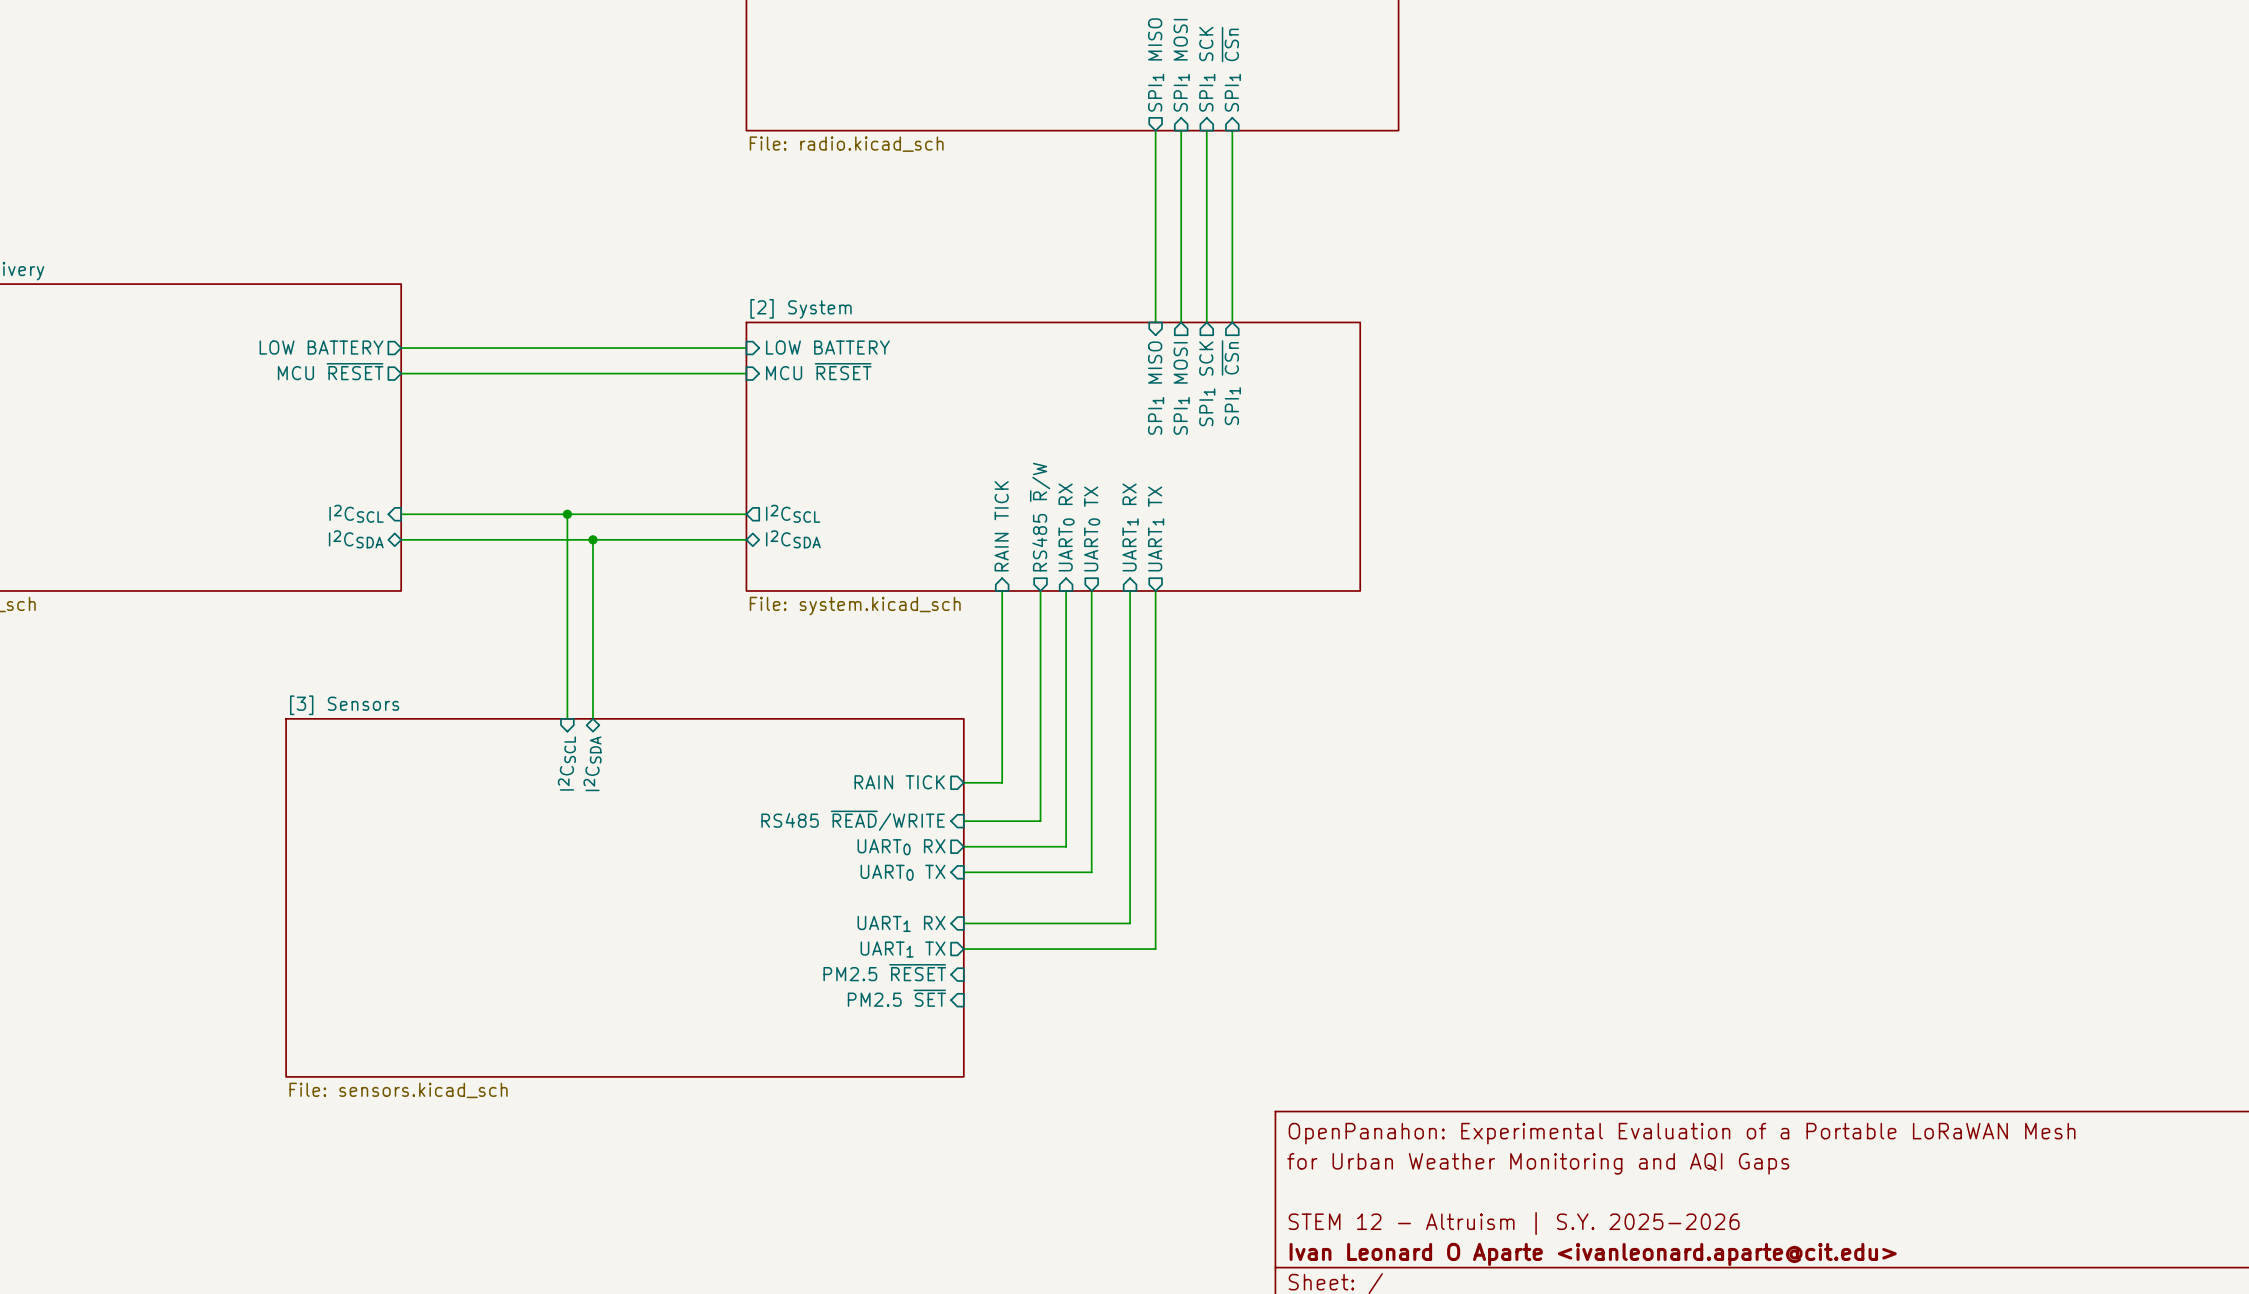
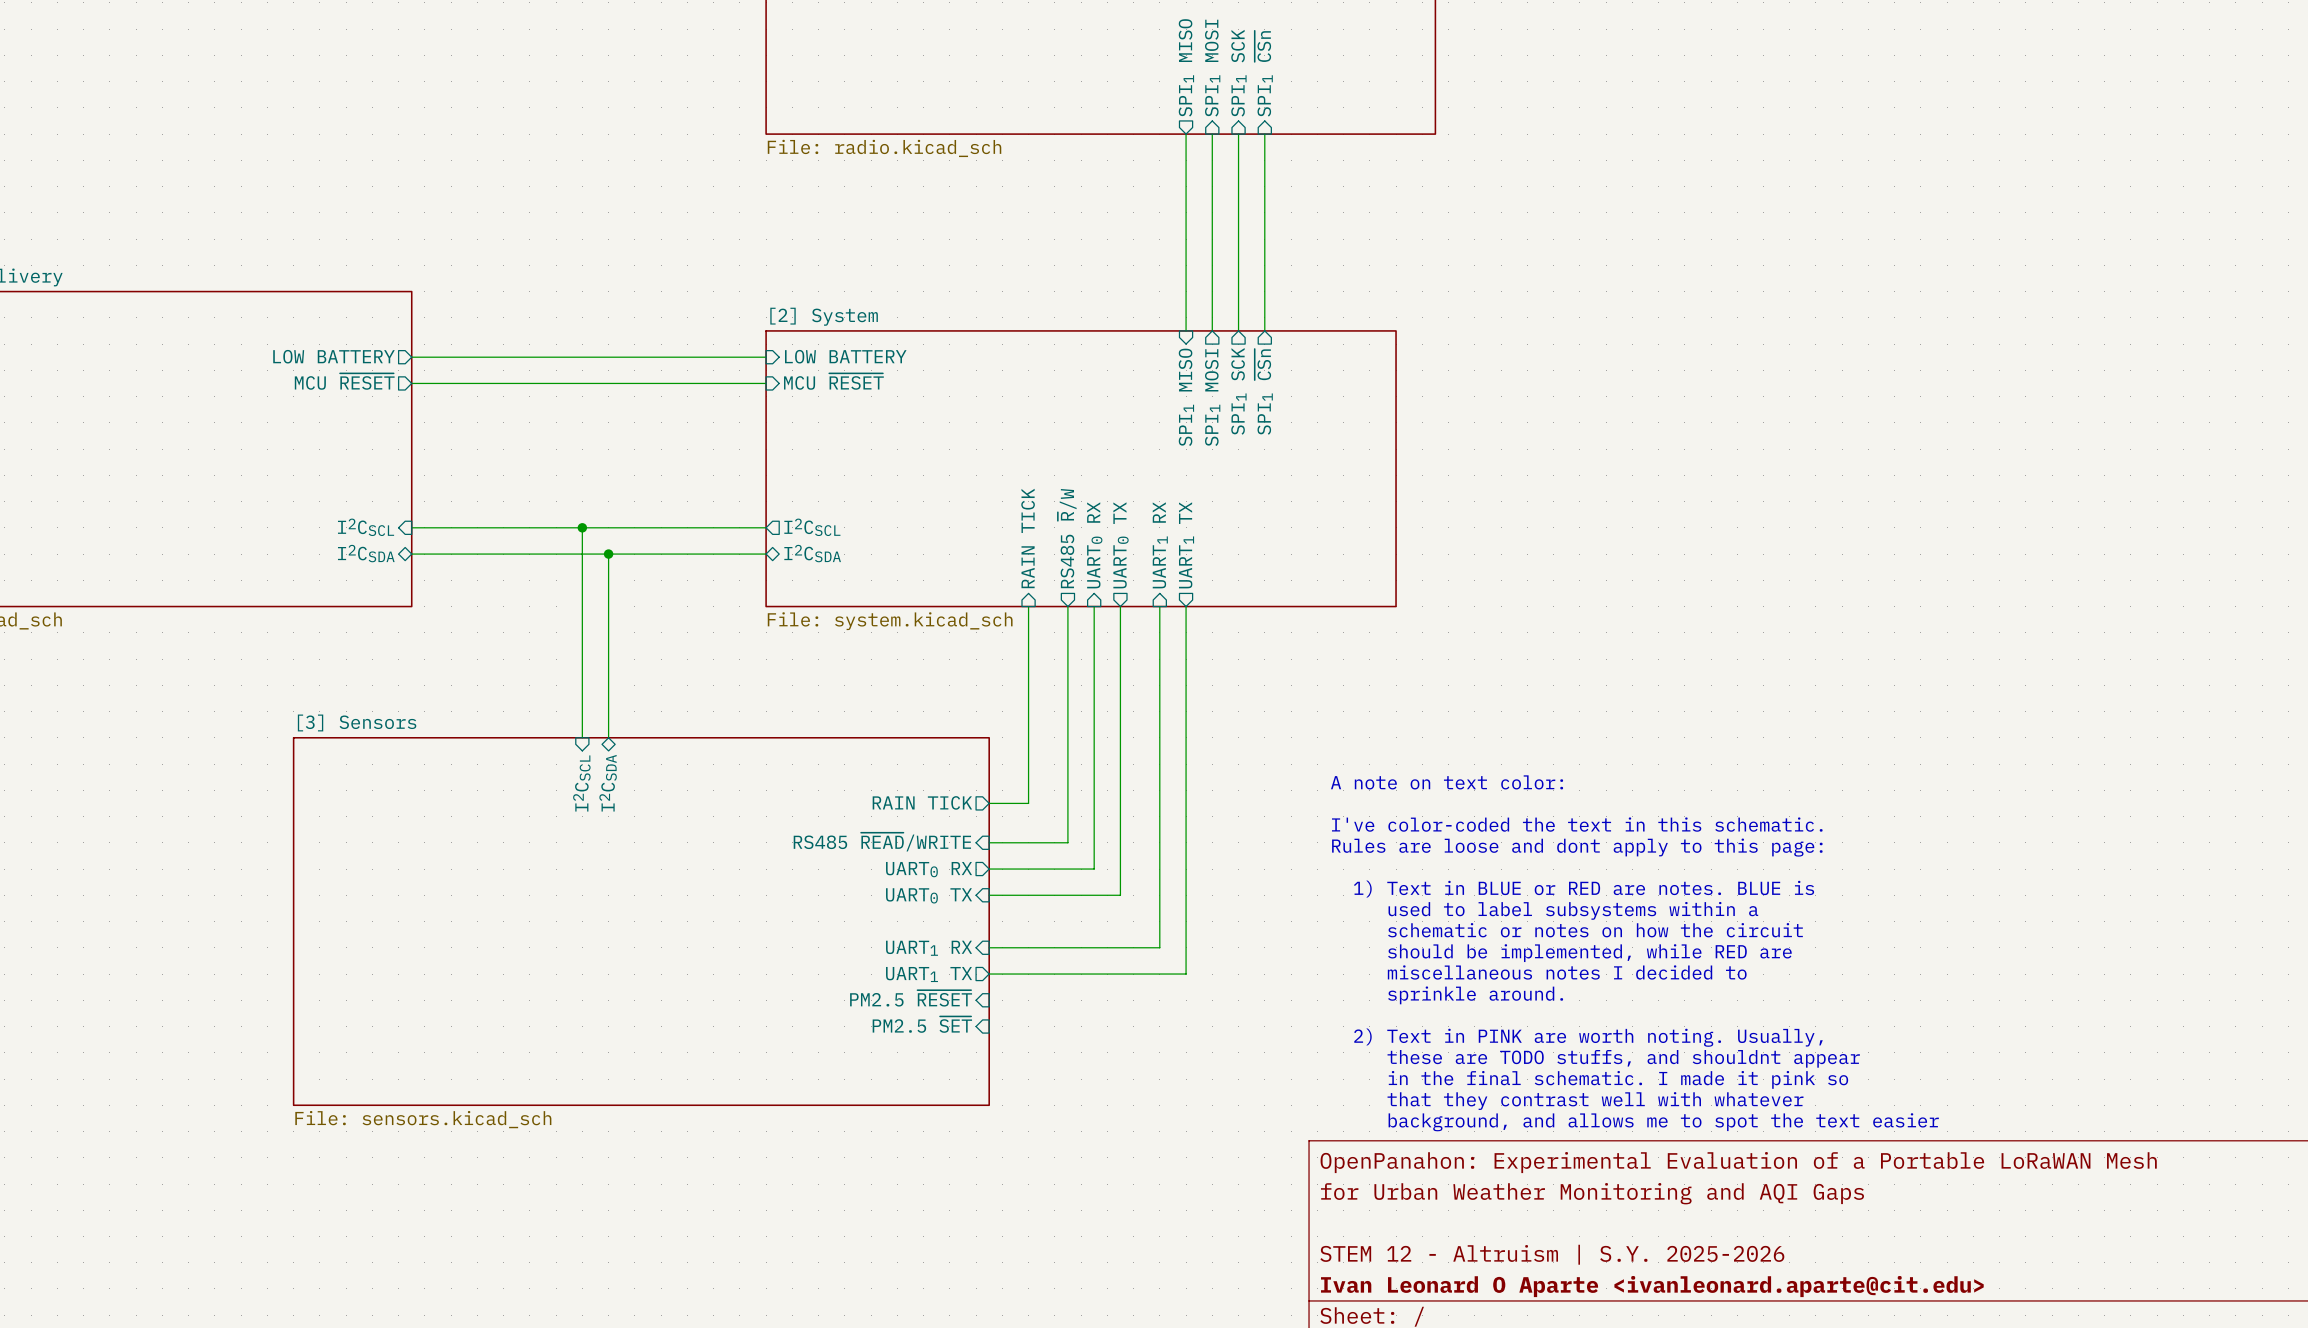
text: none -> A note on text color: (1447, 782)
text: none -> I've color-coded the text in this schematic. (1577, 824)
text: none -> Rules are loose and dont apply to this page: (1577, 847)
text: none -> 1) Text in BLUE or RED are notes. BLUE is (1584, 889)
text: none -> used to label subsystems within a (1573, 910)
text: none -> schematic or notes on how the circuit (1595, 930)
text: none -> should be implemented, while RED are (1589, 953)
text: none -> miscellaneous notes I decided to (1567, 972)
text: none -> sprinkle around. (1475, 995)
text: none -> 2) Text in PINK are worth noting. Usually, (1588, 1037)
text: none -> these are TODO stuffs, and shouldnt appear (1623, 1058)
text: none -> in the final schematic. I made it pink so (1618, 1079)
text: none -> that they contrast well with whatever (1595, 1101)
text: none -> background, and allows me to spot the text easier (1663, 1122)

